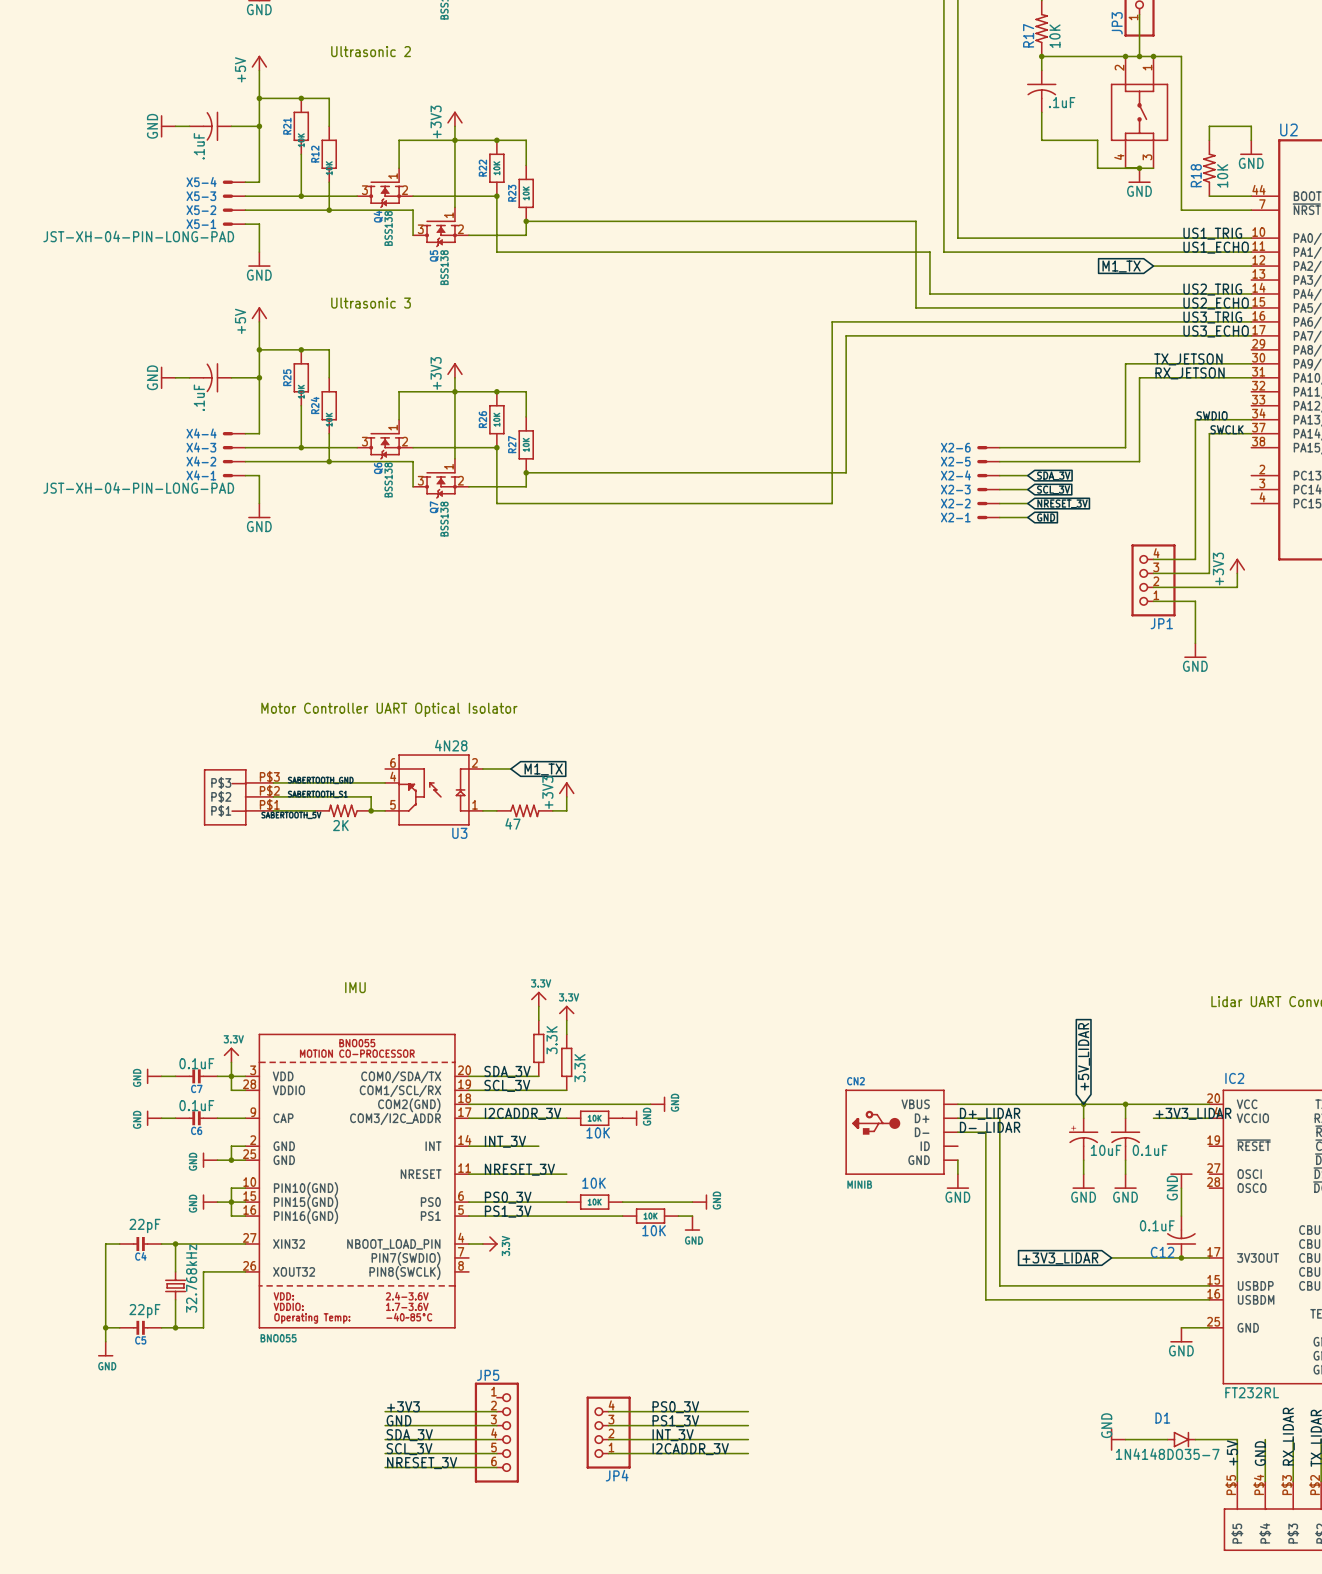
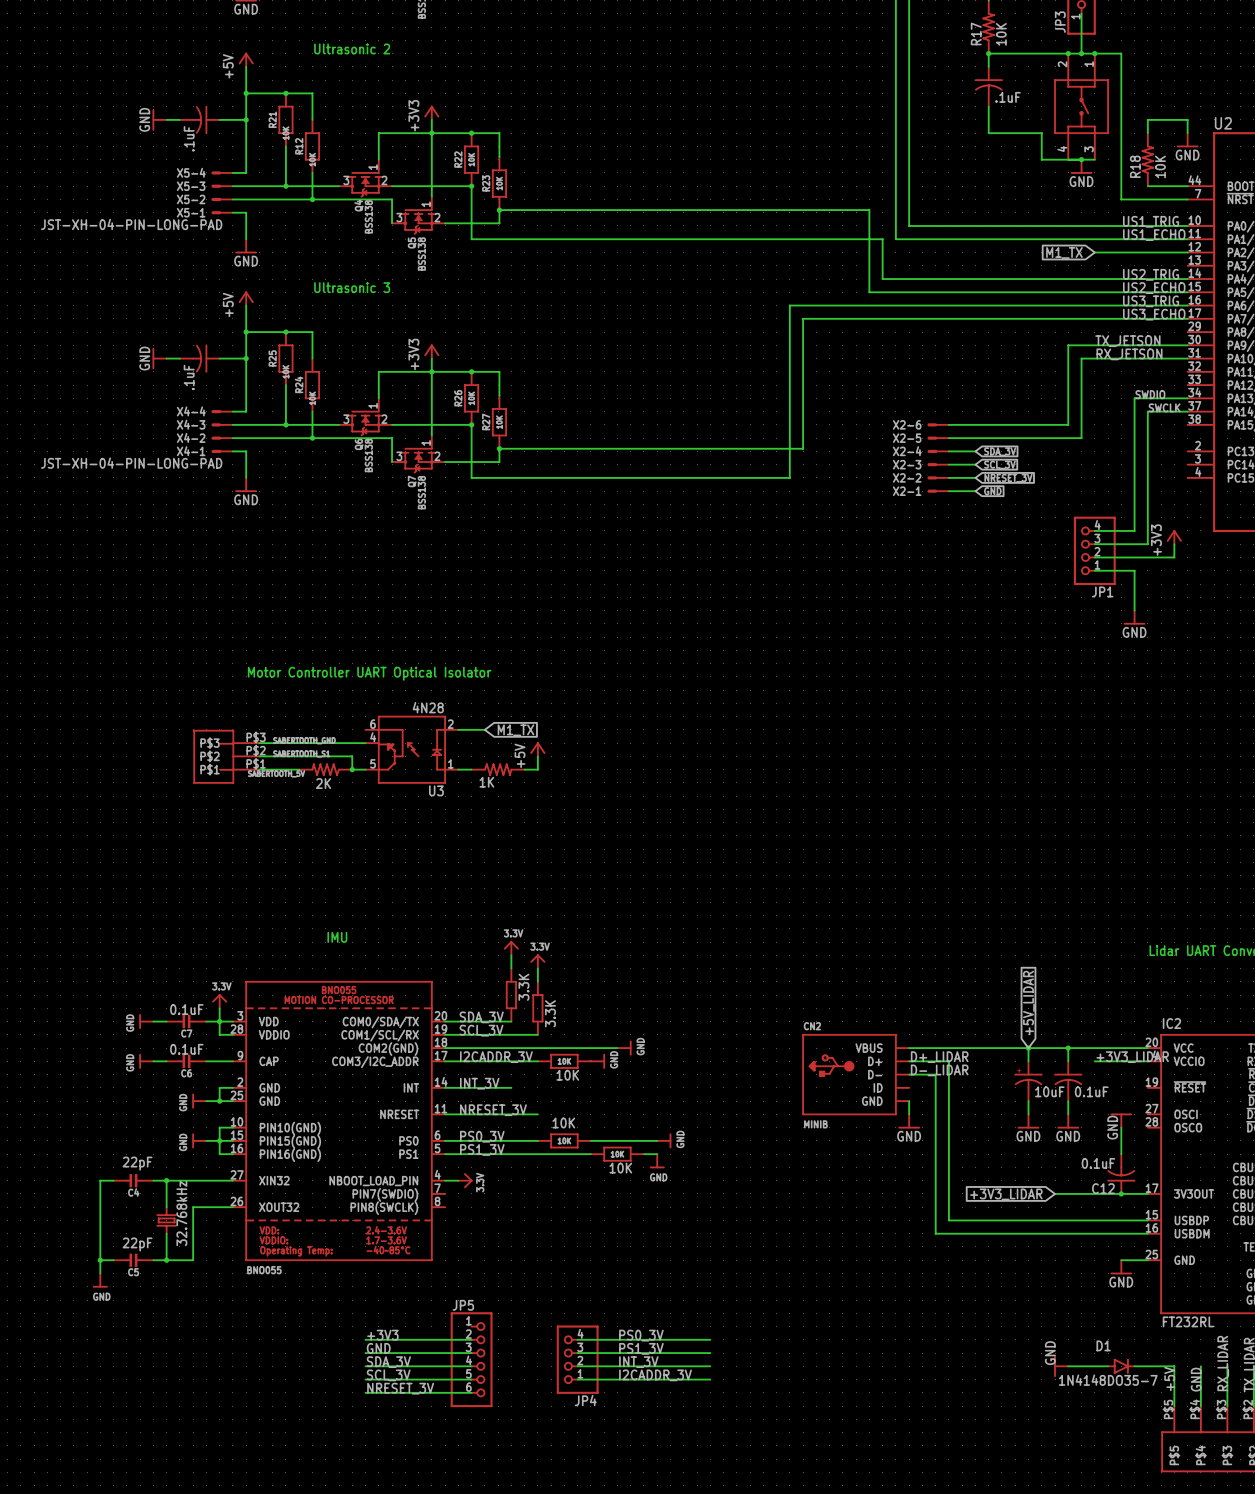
power symbol: +3V3 (566, 789) -> +5V (537, 749)
part value: 47 (512, 823) -> 1K (486, 782)

